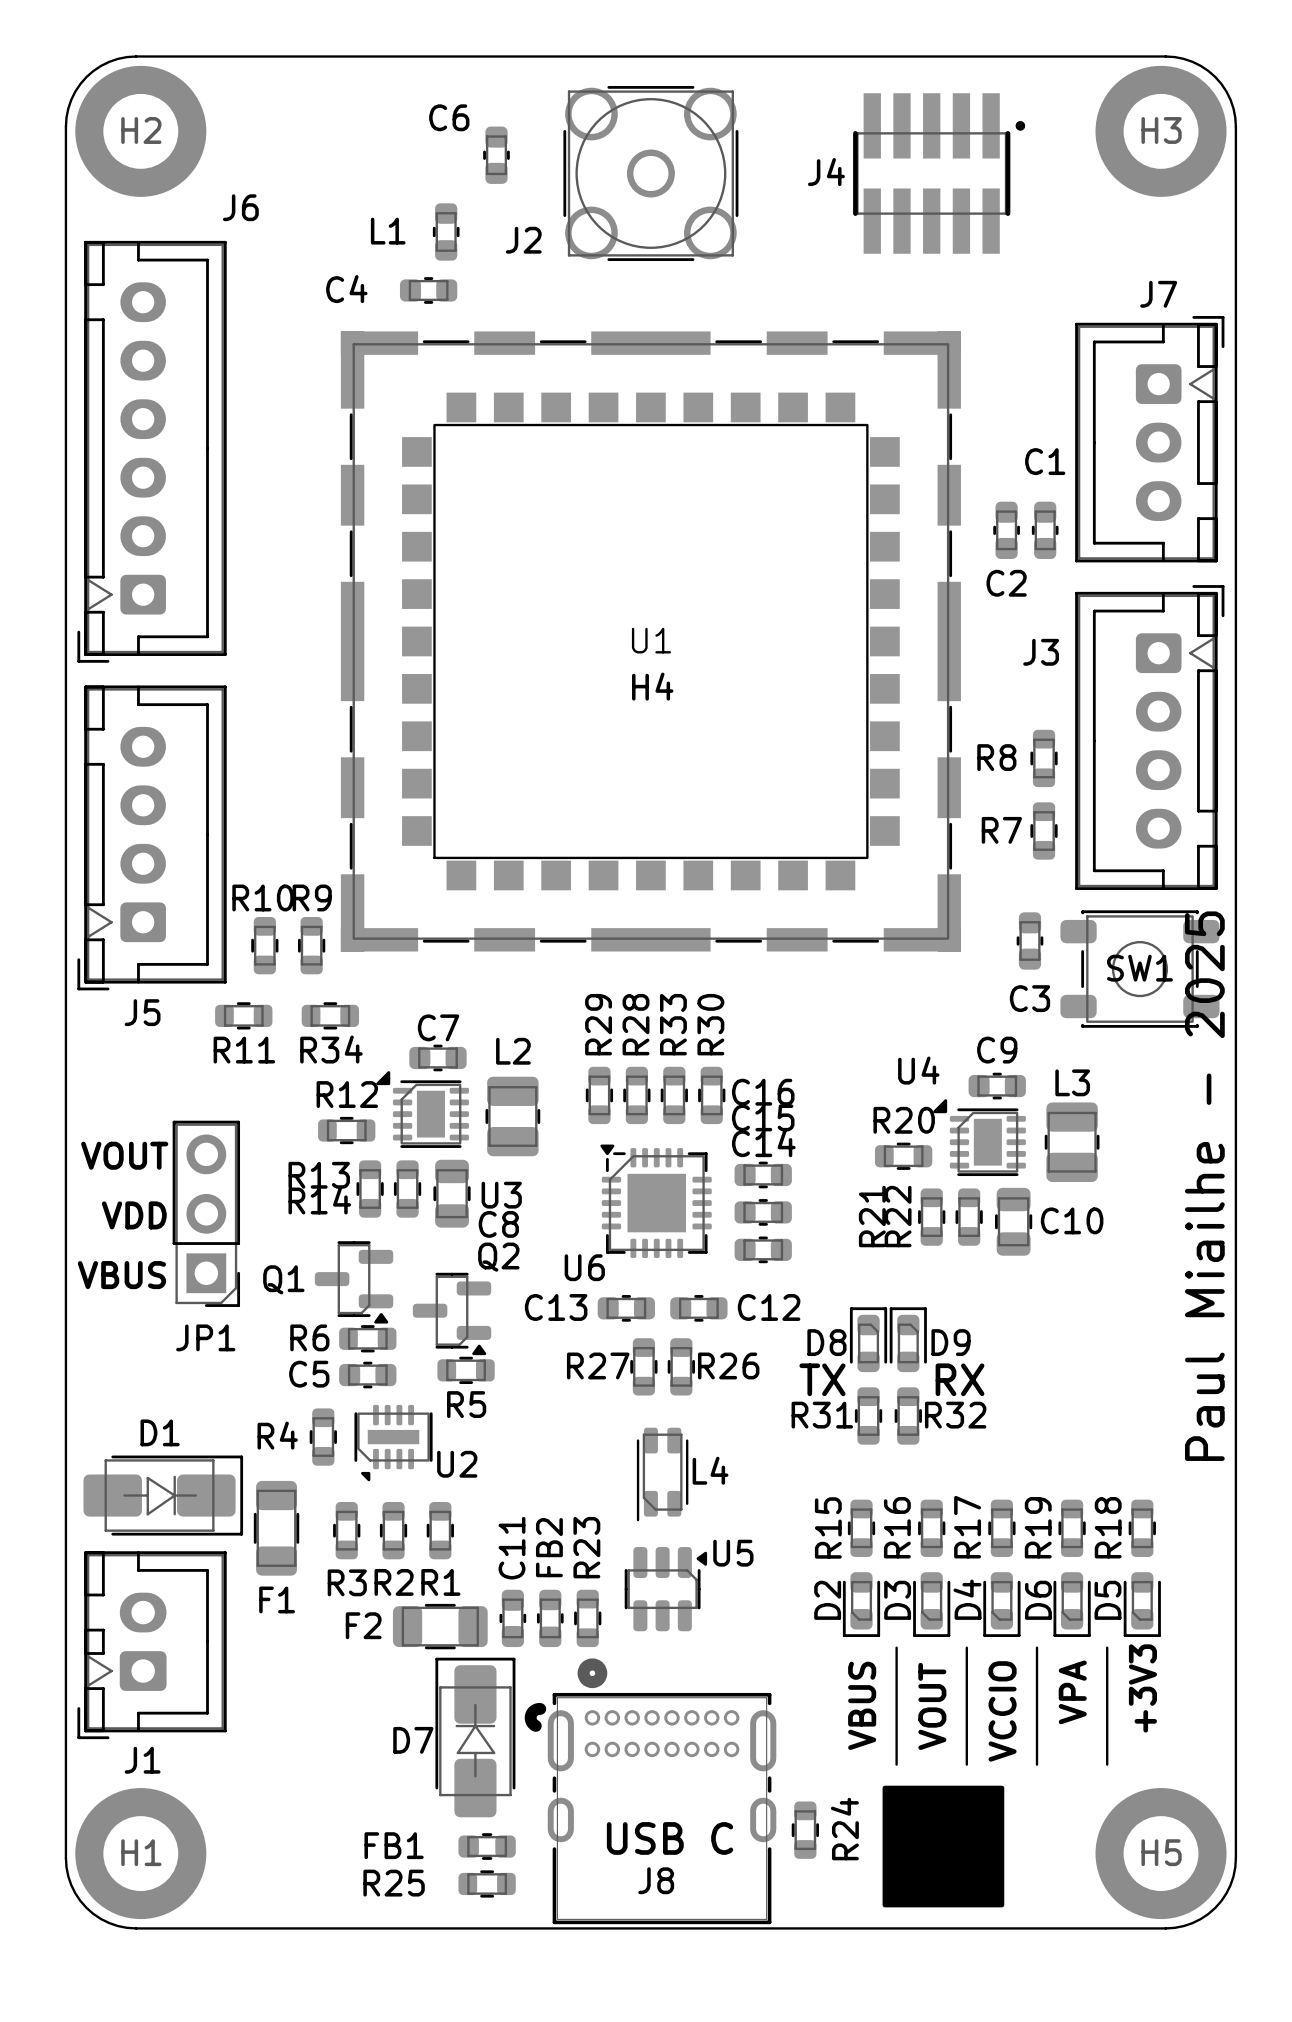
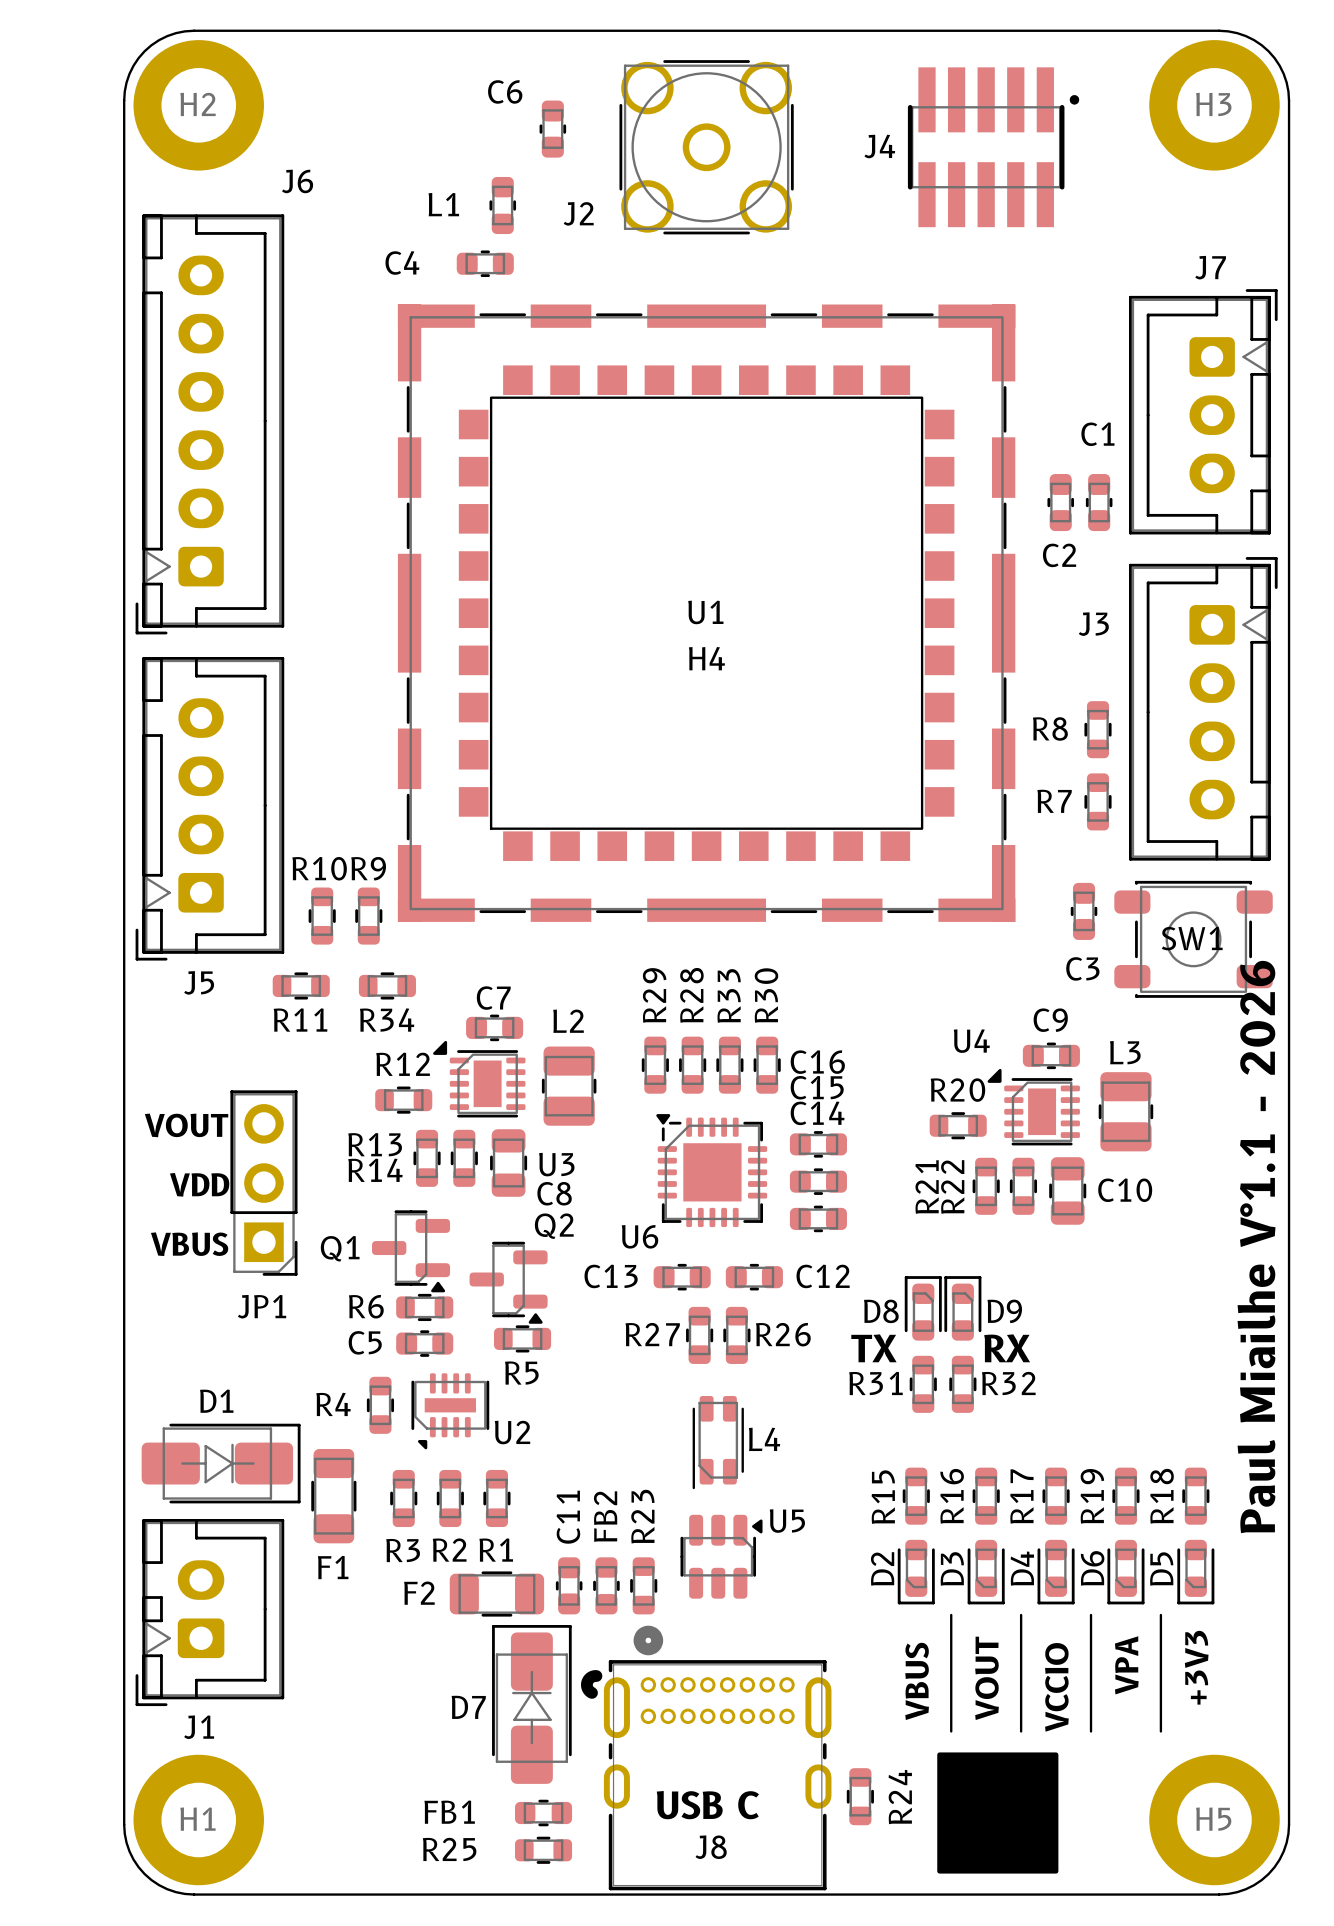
text: Paul Miailhe - 2025 (1204, 1186) -> Paul Miailhe V°1.1 - 2026 (1256, 1247)

